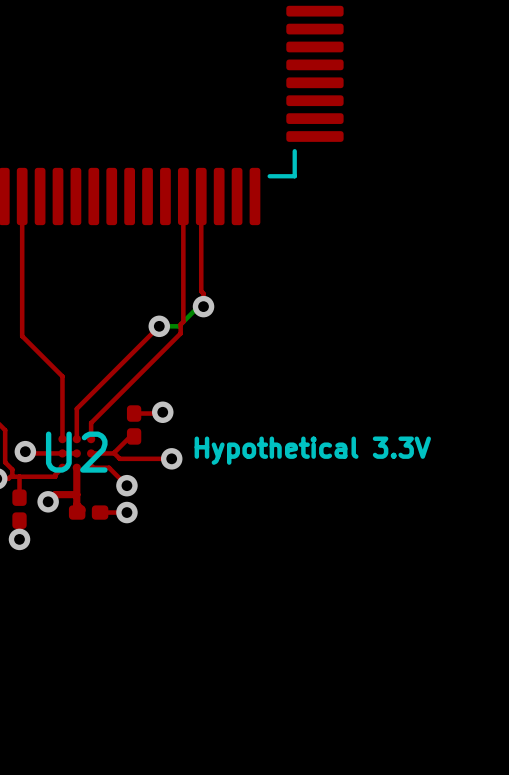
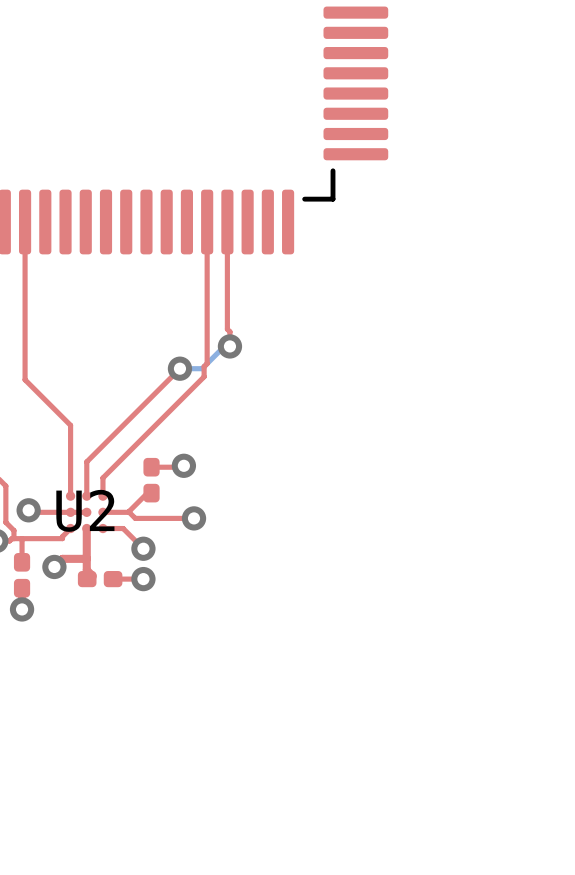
text: Hypothetical 3.3V (312, 450) -> none

